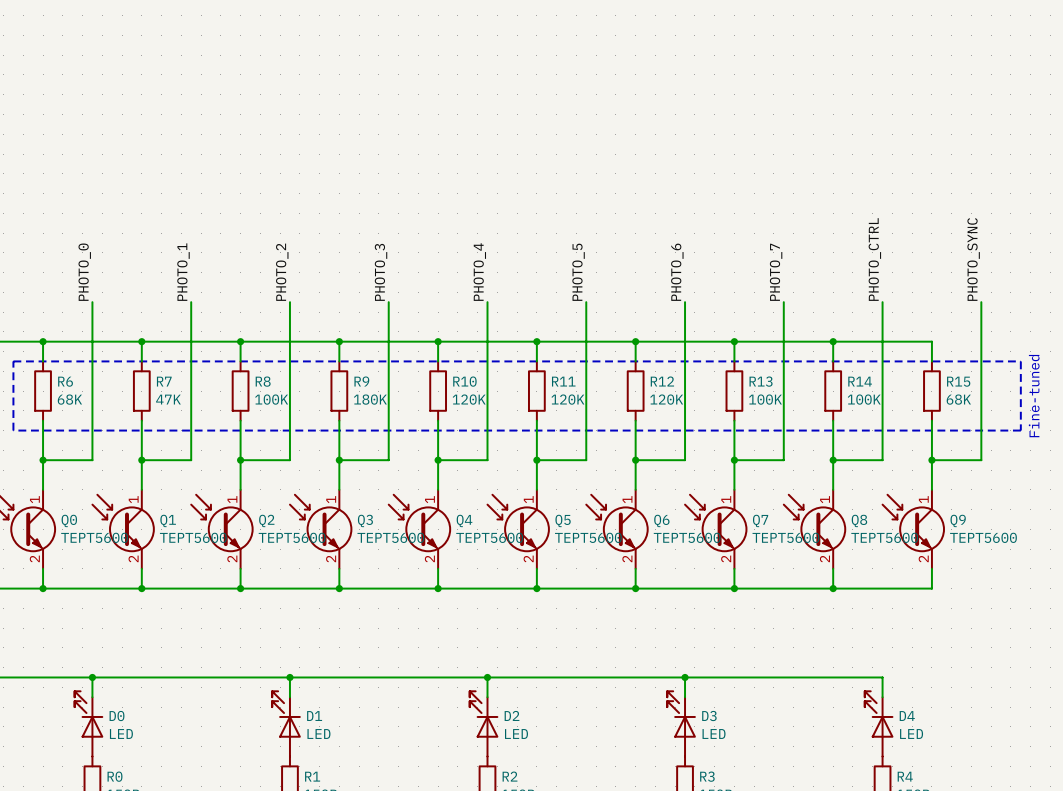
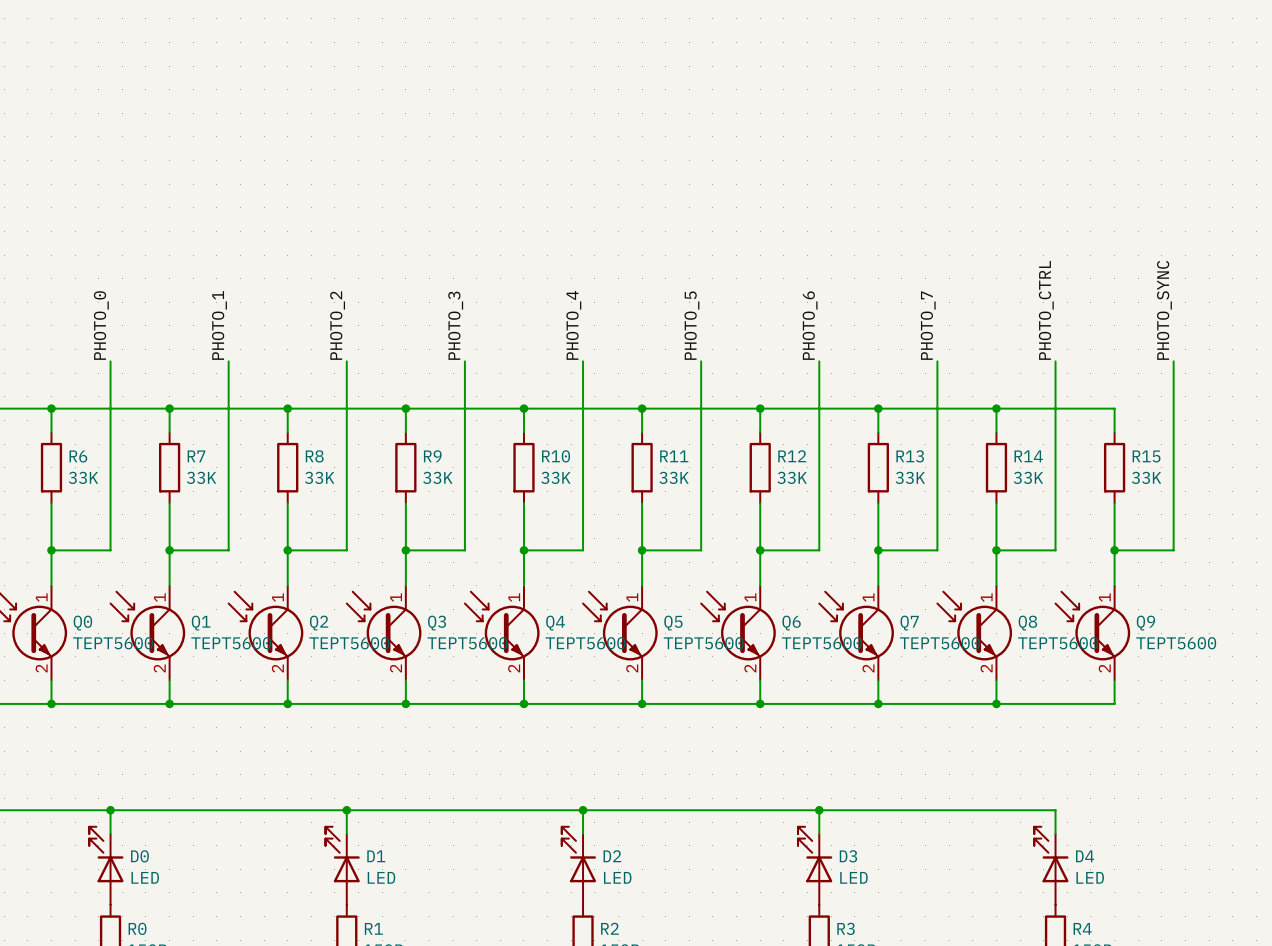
line: (13, 361) (1020, 361) (1020, 430) (13, 430) (13, 361) -> none
text: Fine-tuned (1034, 396) -> none
R6 value: 68K (69, 399) -> 33K (83, 477)
R7 value: 47K (168, 399) -> 33K (201, 477)
R8 value: 100K (271, 399) -> 33K (319, 477)
R9 value: 180K (370, 399) -> 33K (437, 477)
R10 value: 120K (469, 399) -> 33K (555, 477)
R11 value: 120K (567, 399) -> 33K (674, 477)
R12 value: 120K (666, 399) -> 33K (792, 477)
R13 value: 100K (765, 399) -> 33K (910, 477)
R14 value: 100K (864, 399) -> 33K (1028, 477)
R15 value: 68K (958, 399) -> 33K (1146, 477)

